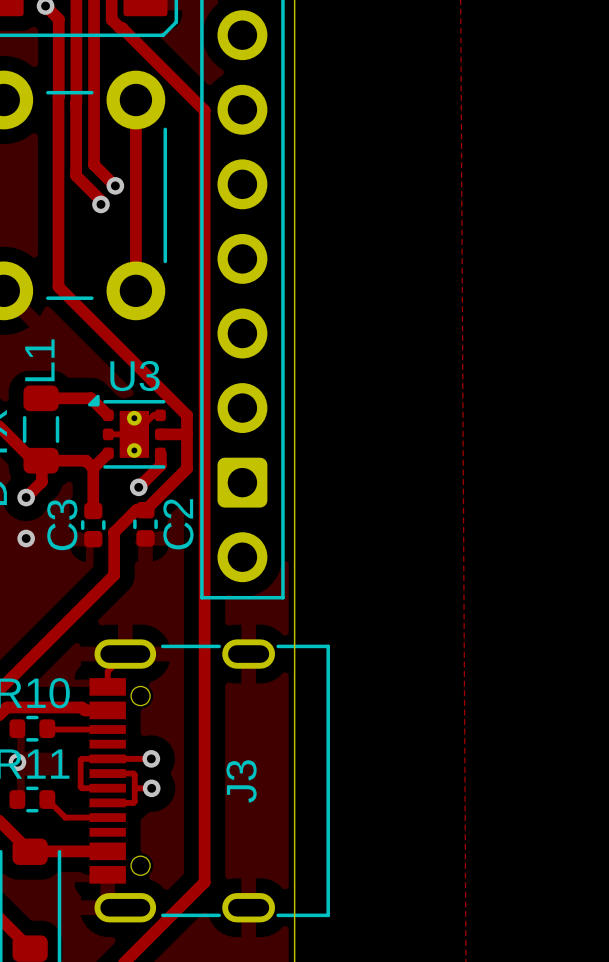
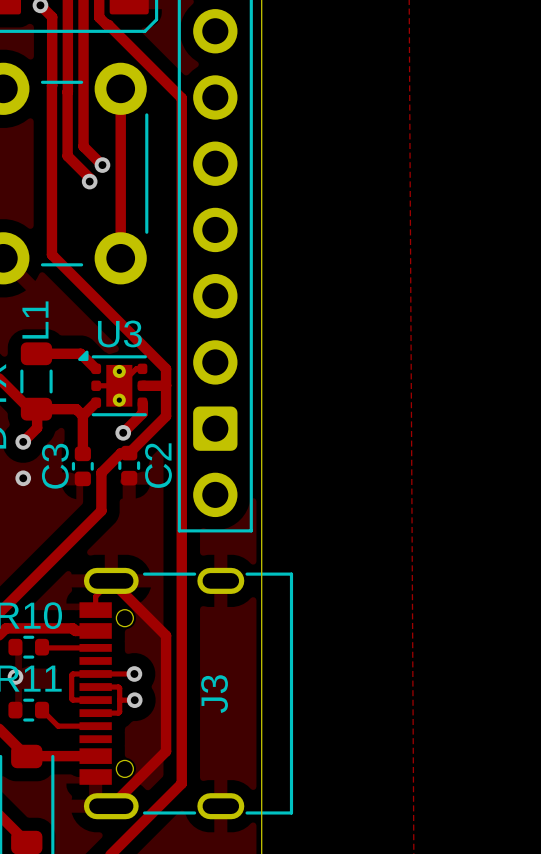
track: none -> (111, 580) (166, 635) (166, 751) (111, 806)

